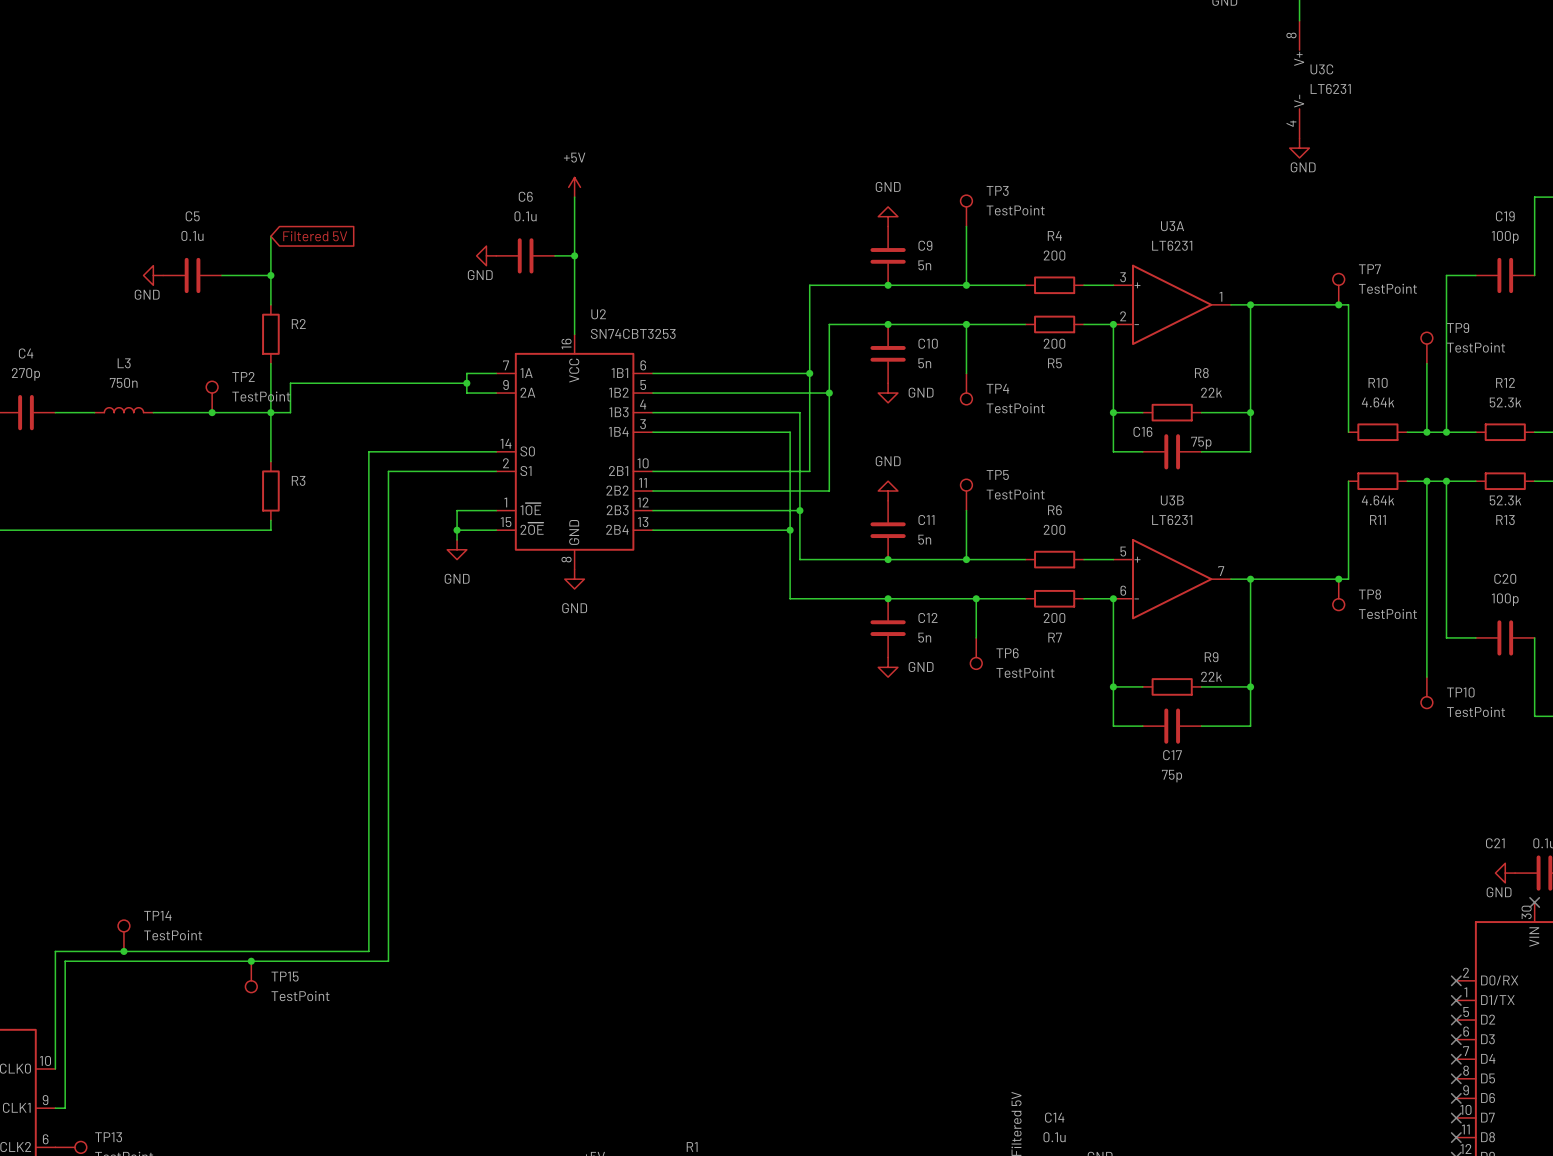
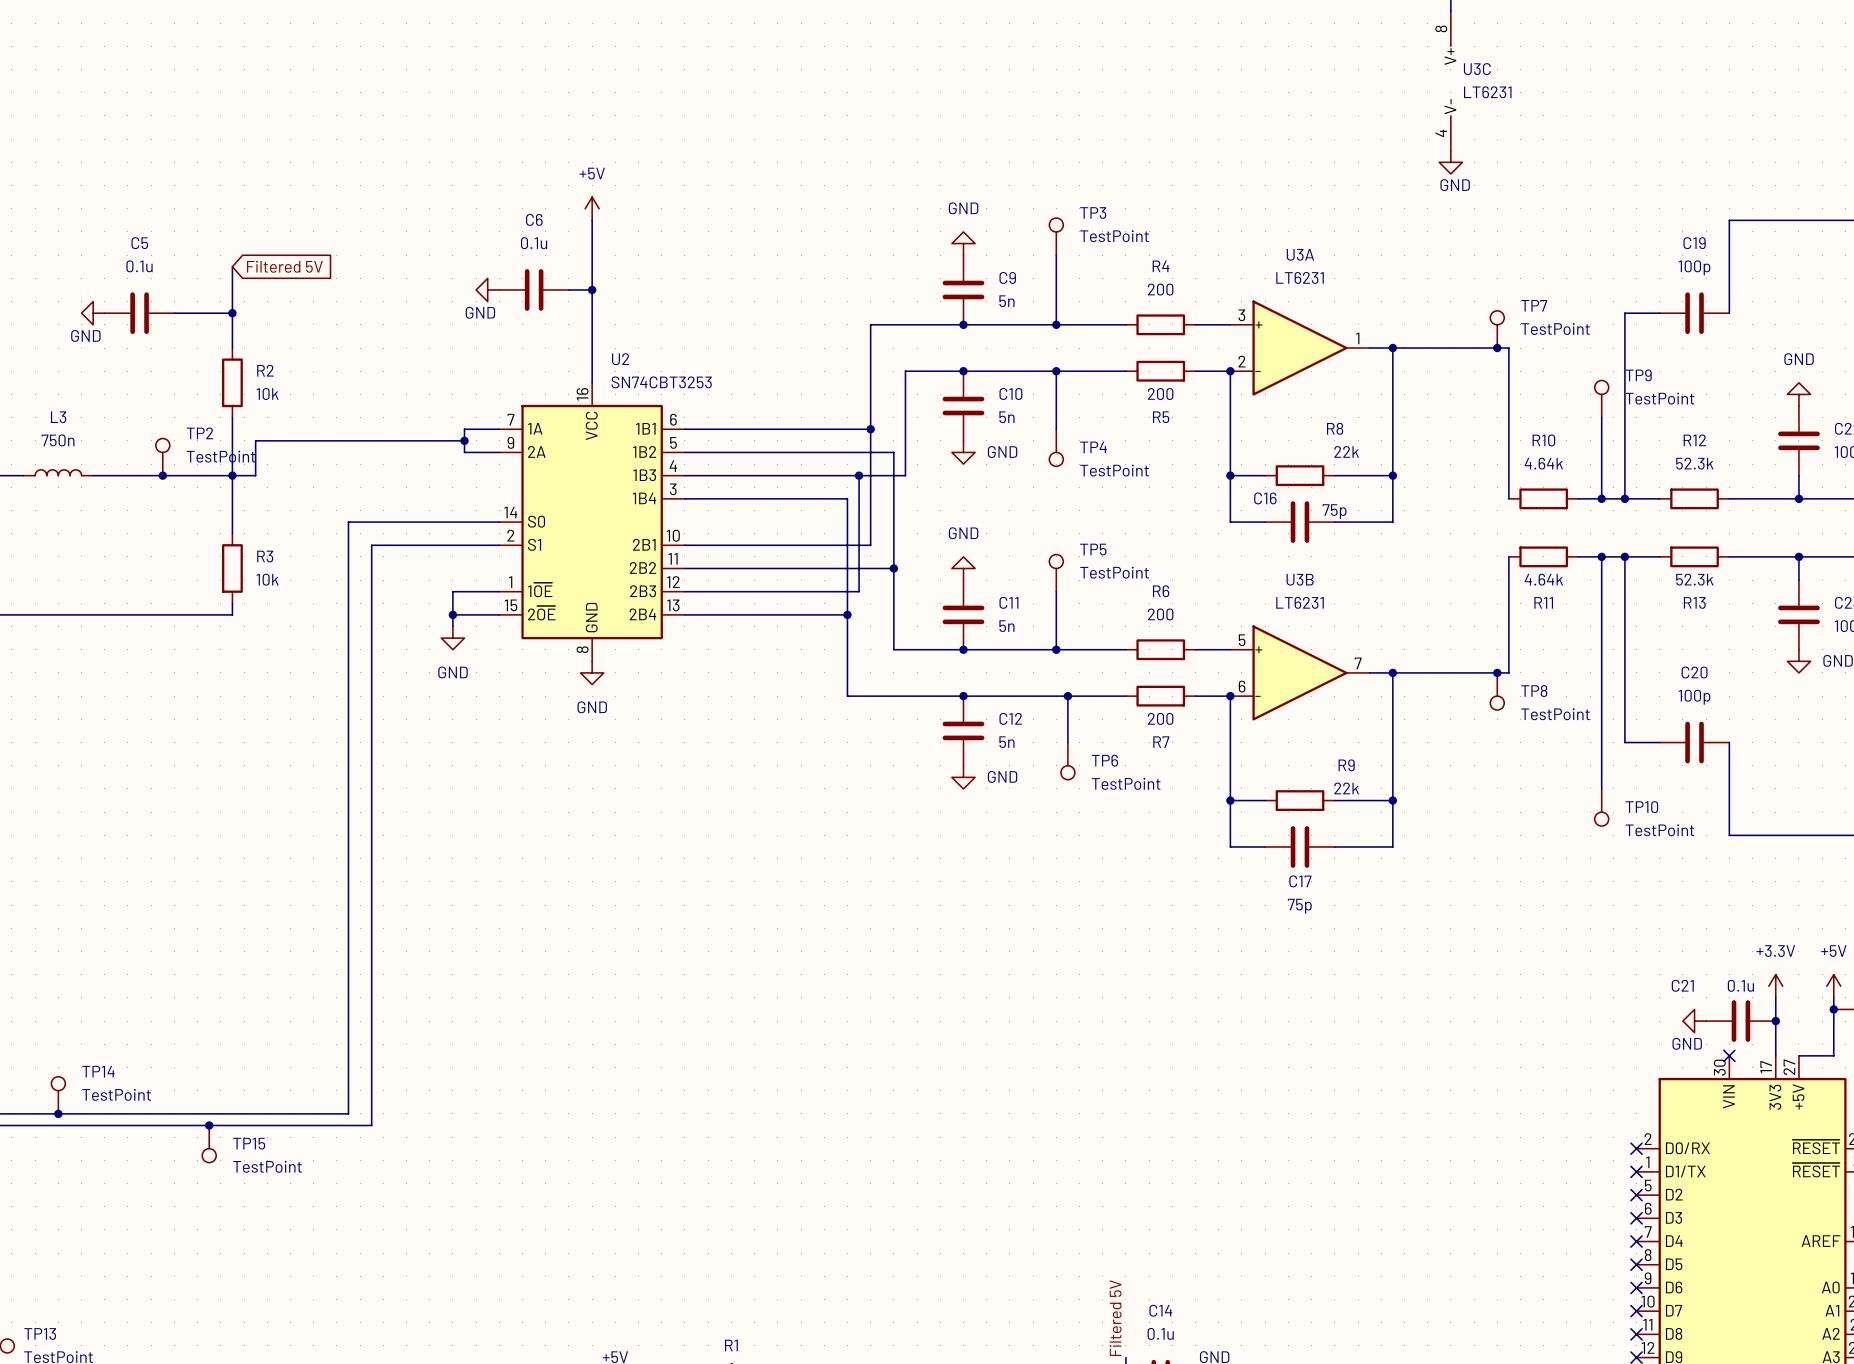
wire: (839, 324) (829, 324) (829, 393) -> (905, 371) (905, 475) (859, 475)
R2 value: none -> 10k (267, 394)
junction position: (829, 393) -> (859, 475)
R3 value: none -> 10k (267, 579)
wire: (799, 510) (799, 559) (829, 559) -> (893, 568) (893, 649)
junction position: (799, 510) -> (893, 568)

